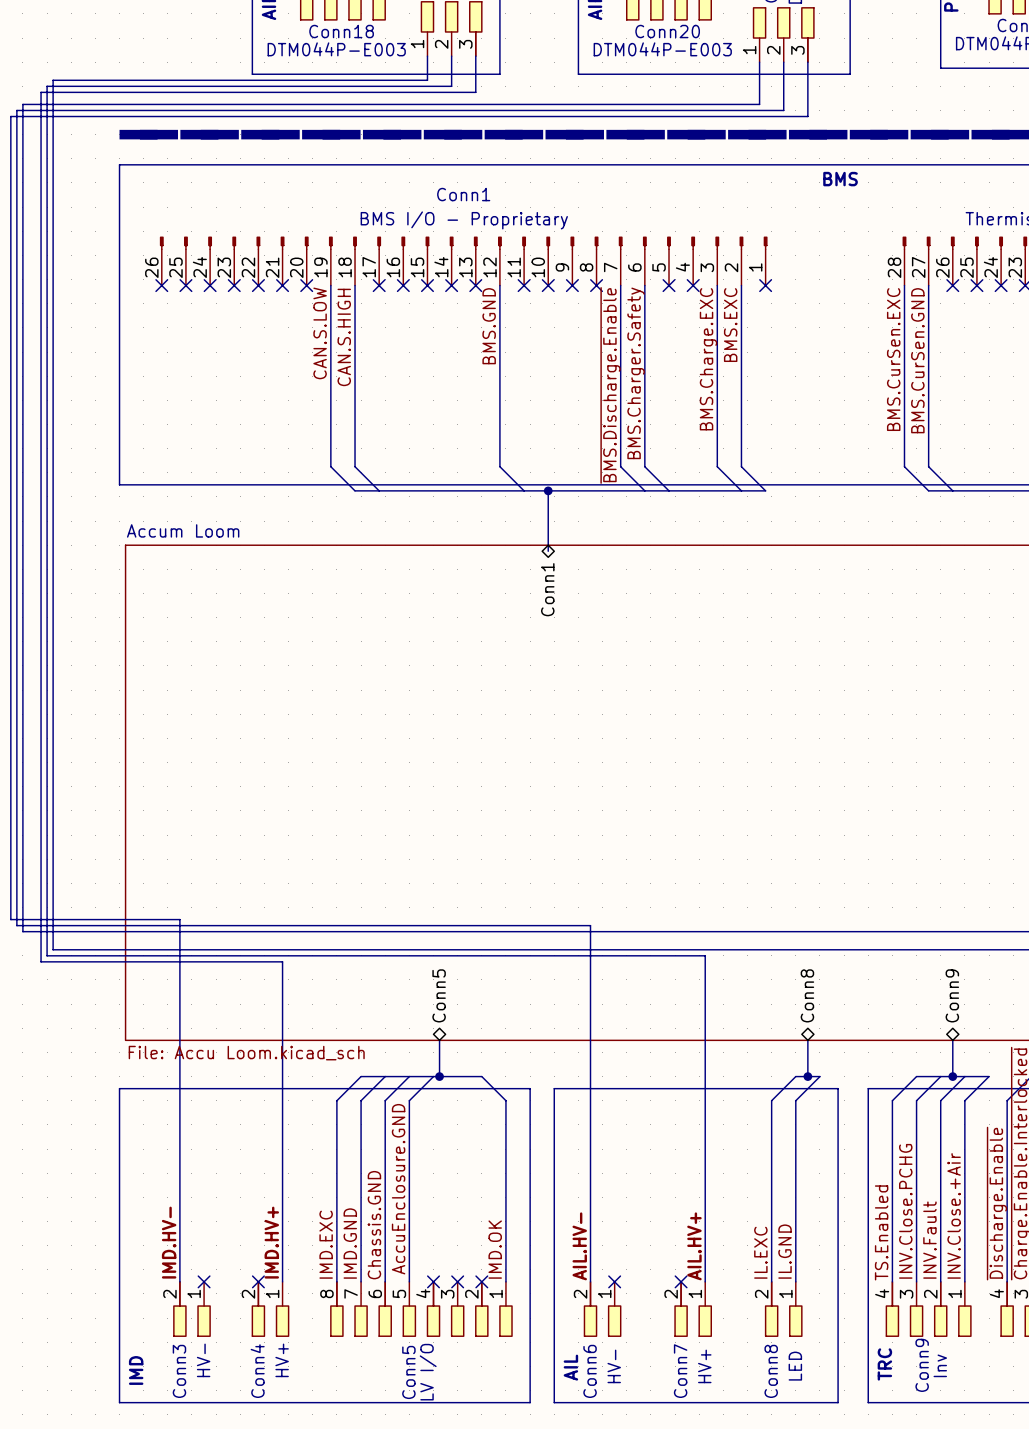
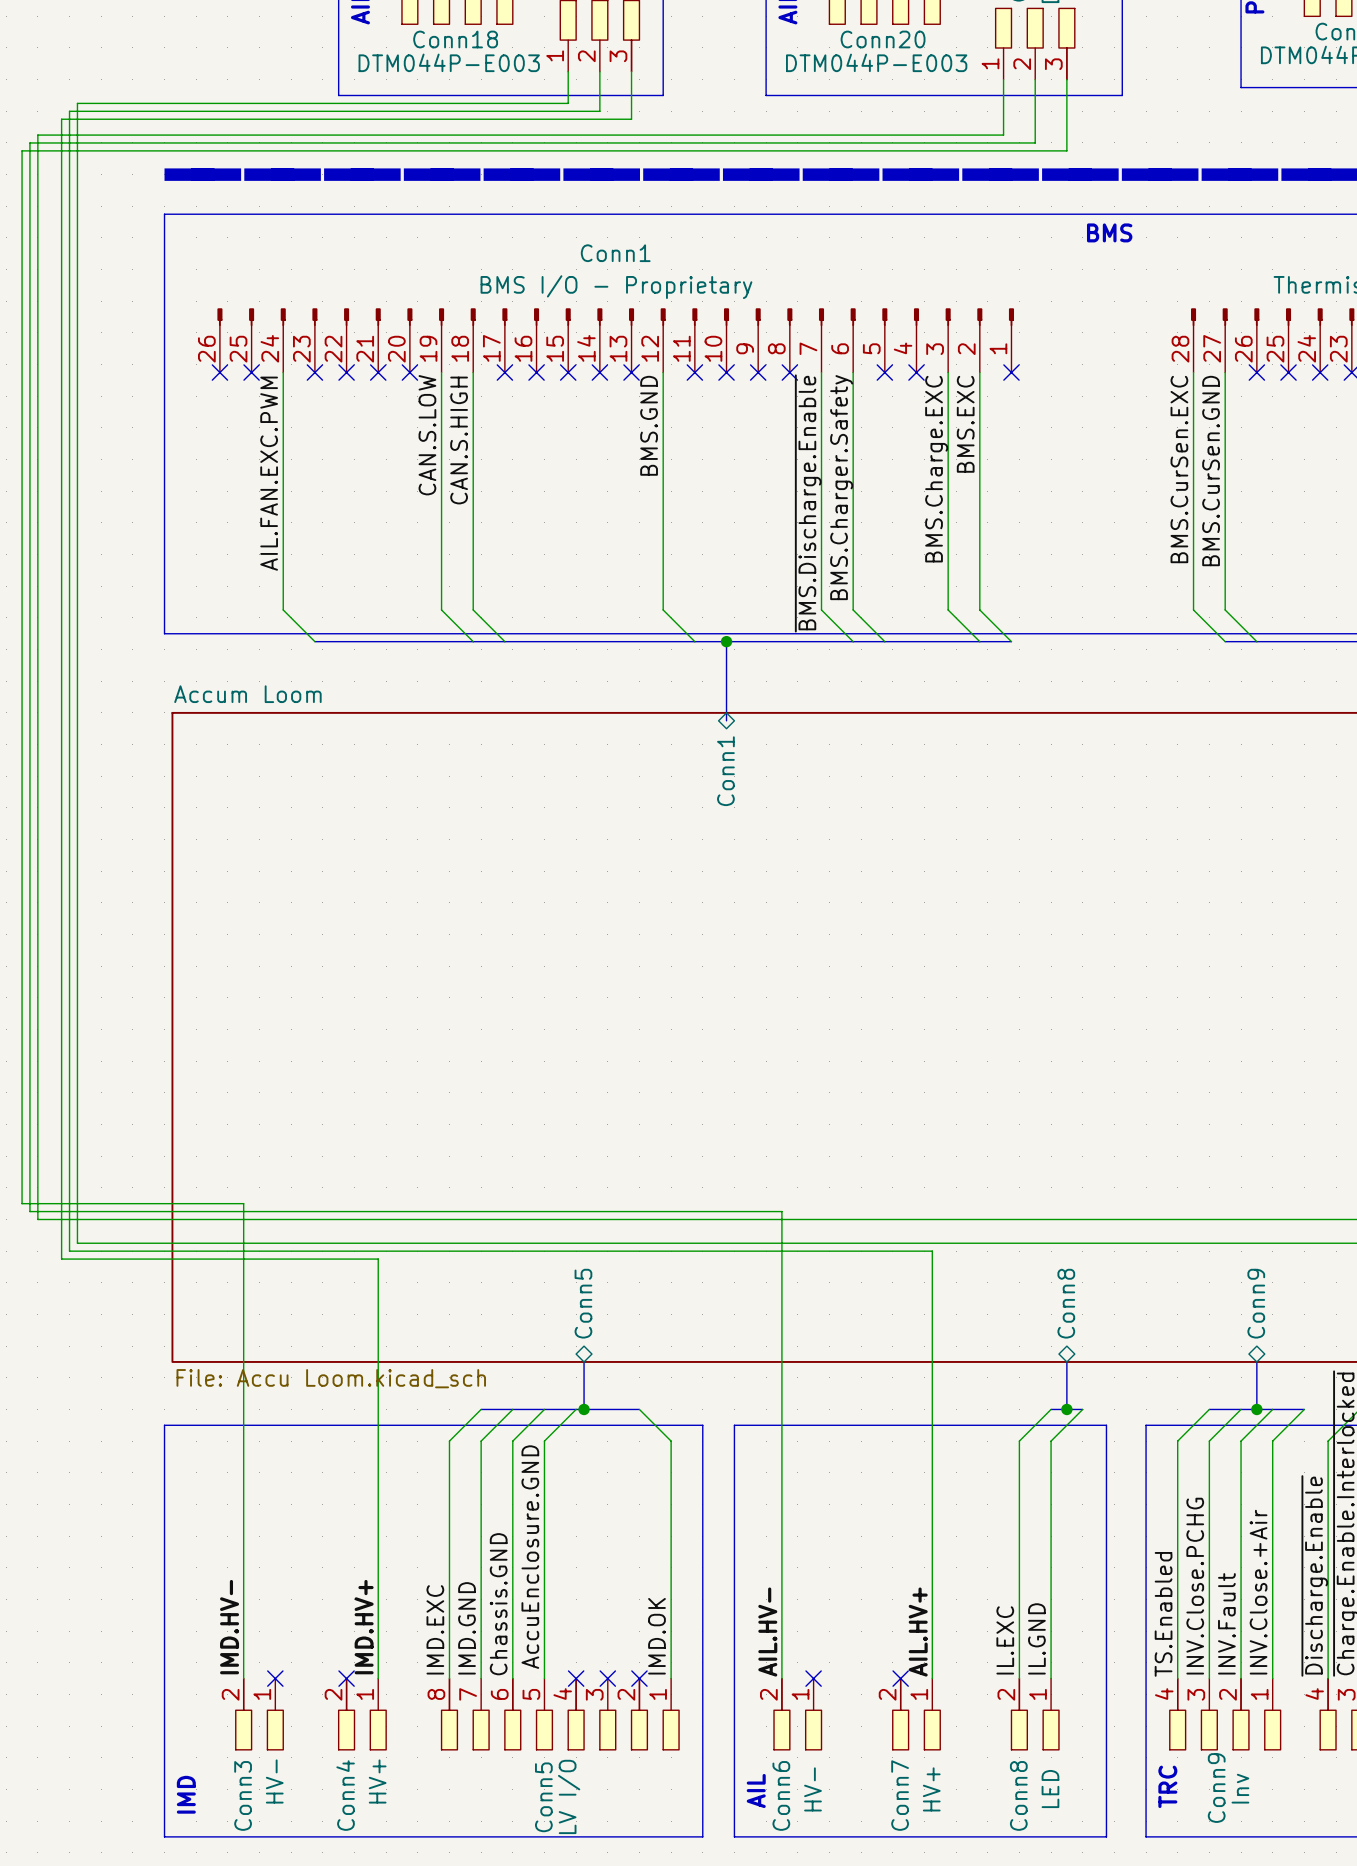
wire: none -> (283, 372) (283, 609) (314, 641)
no-connect mark: (210, 285) -> none
label: none -> AIL.FAN.EXC.PWM (269, 473)
bus: none -> (314, 641) (473, 641)

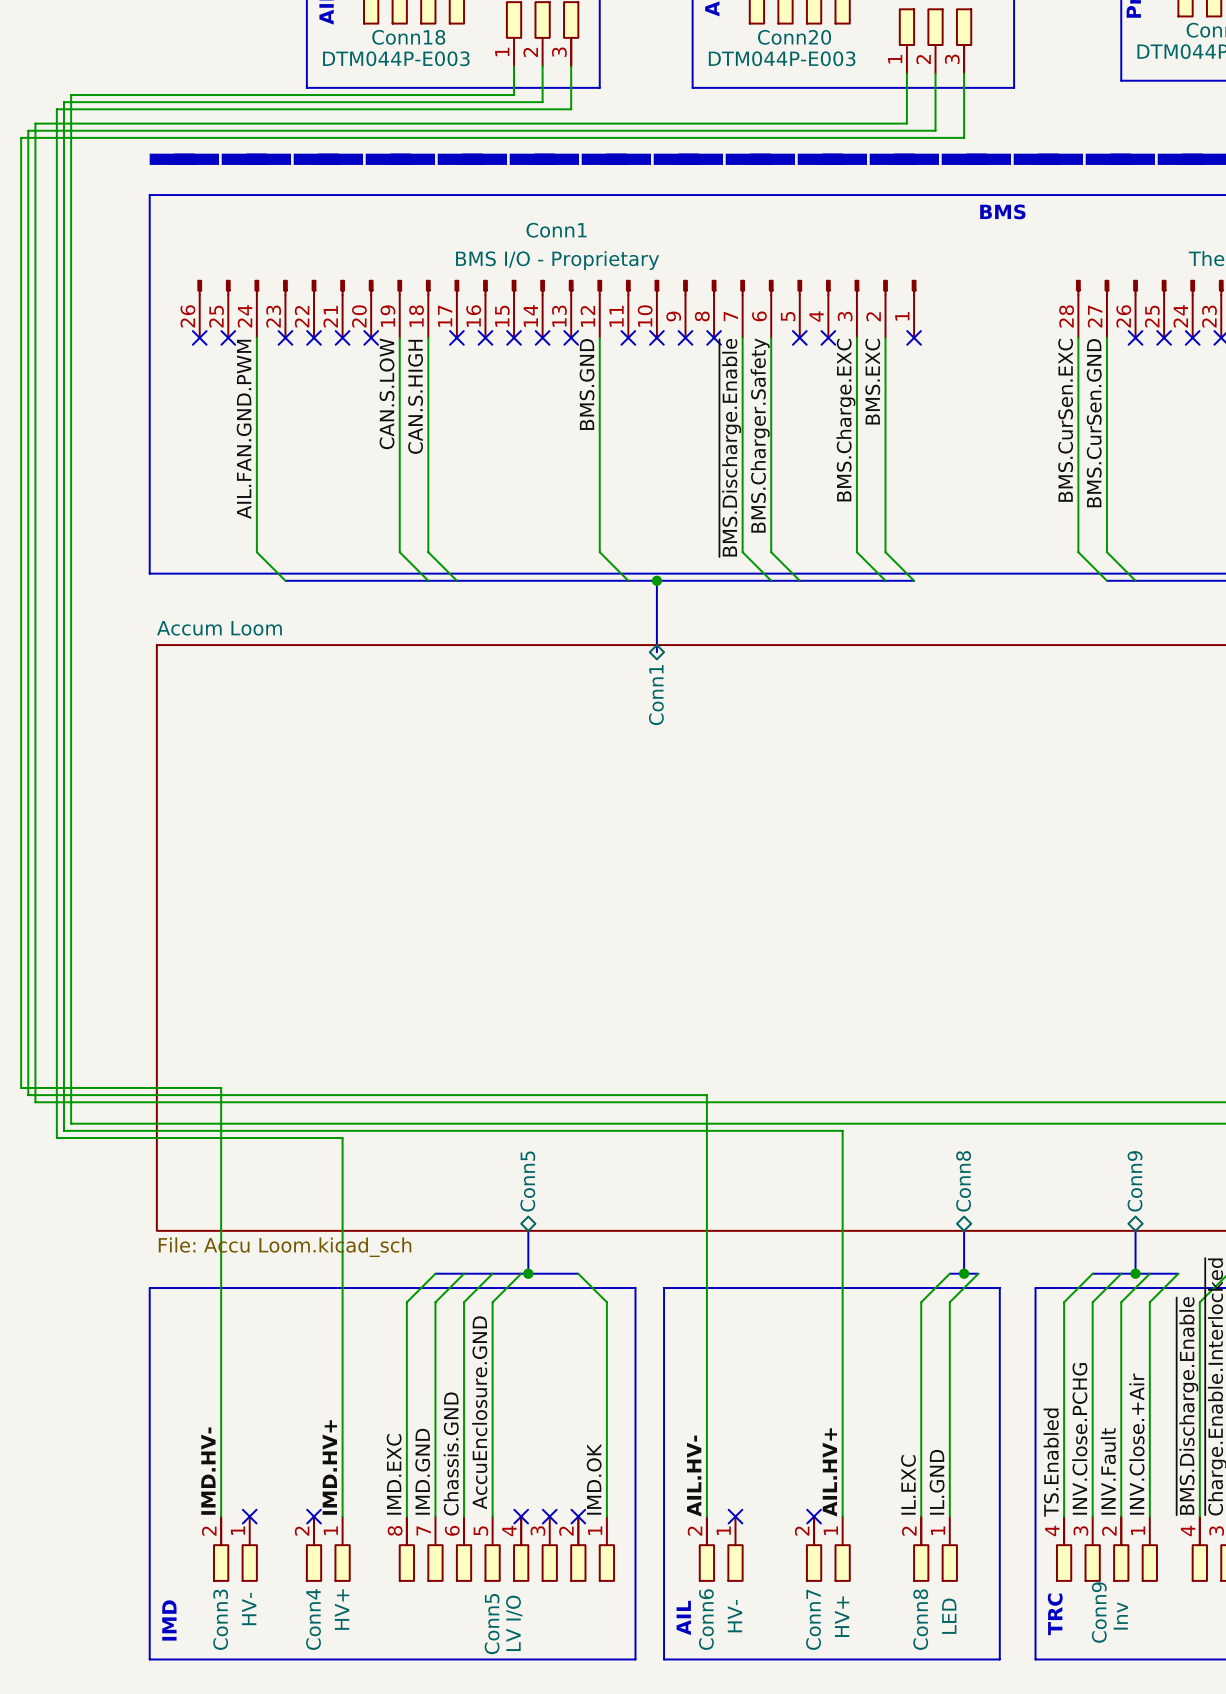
label: AIL.FAN.EXC.PWM (269, 473) -> AIL.FAN.GND.PWM (244, 429)
label: ~{Discharge.Enable} (1314, 1575) -> ~{BMS.Discharge.Enable} (1187, 1406)

